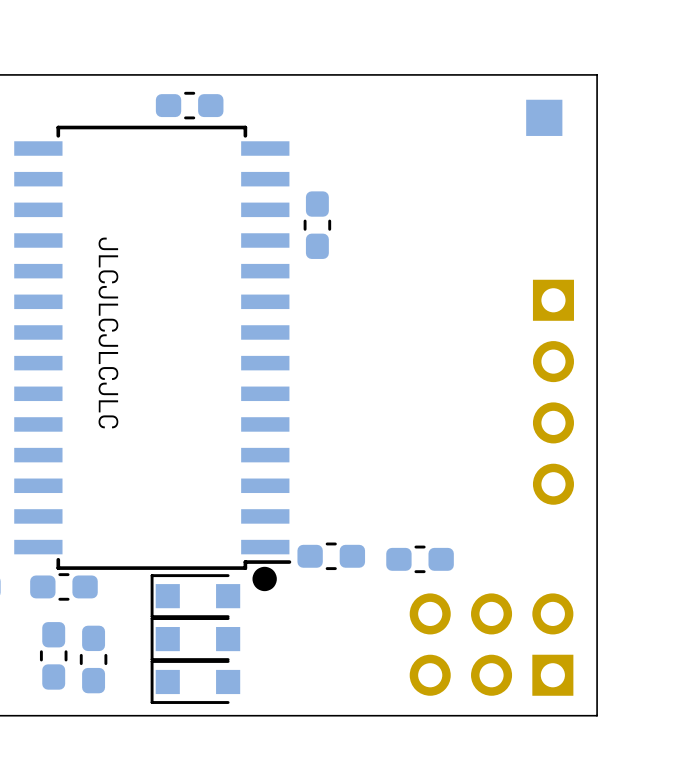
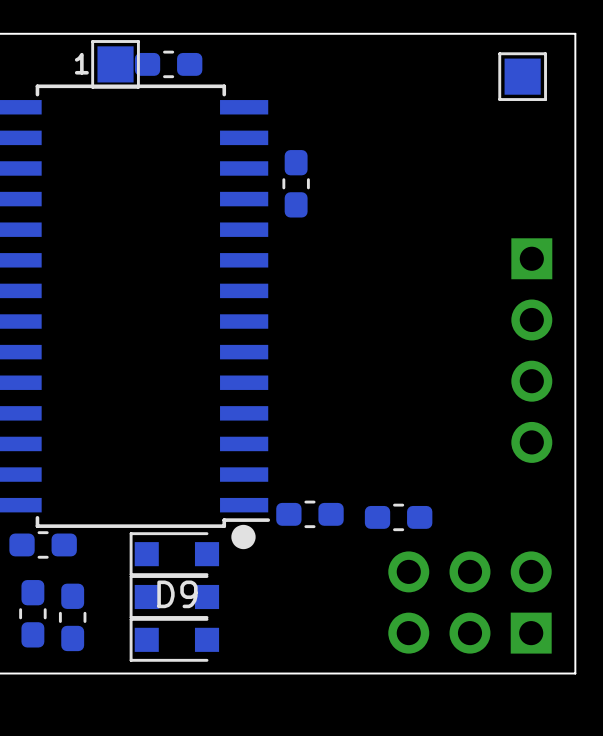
part footprint: [526, 99, 563, 136] -> [498, 52, 547, 101]
text: none -> 1 (81, 63)
part: none -> (115, 64)
text: JLCJLCJLCJLC (108, 332) -> none
D9 name: none -> D9 (177, 594)

